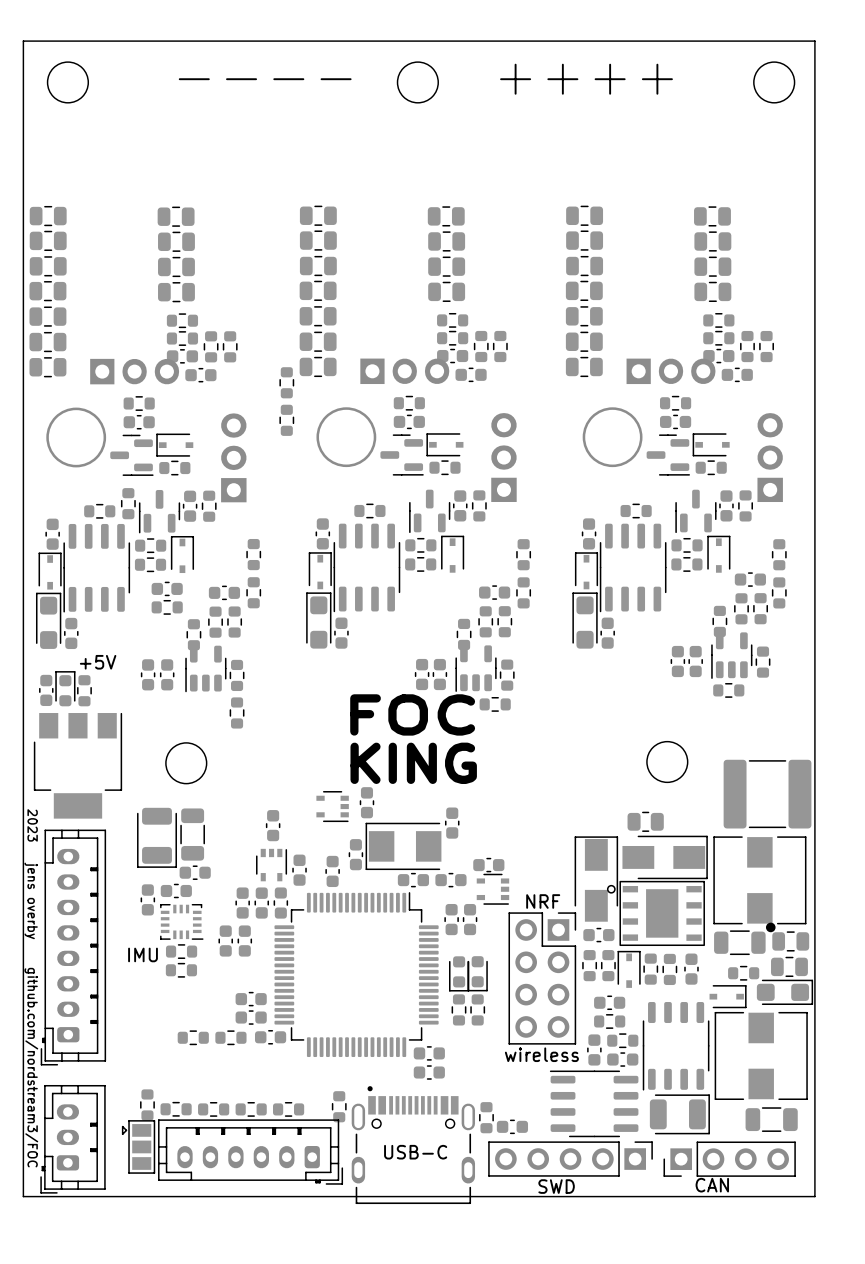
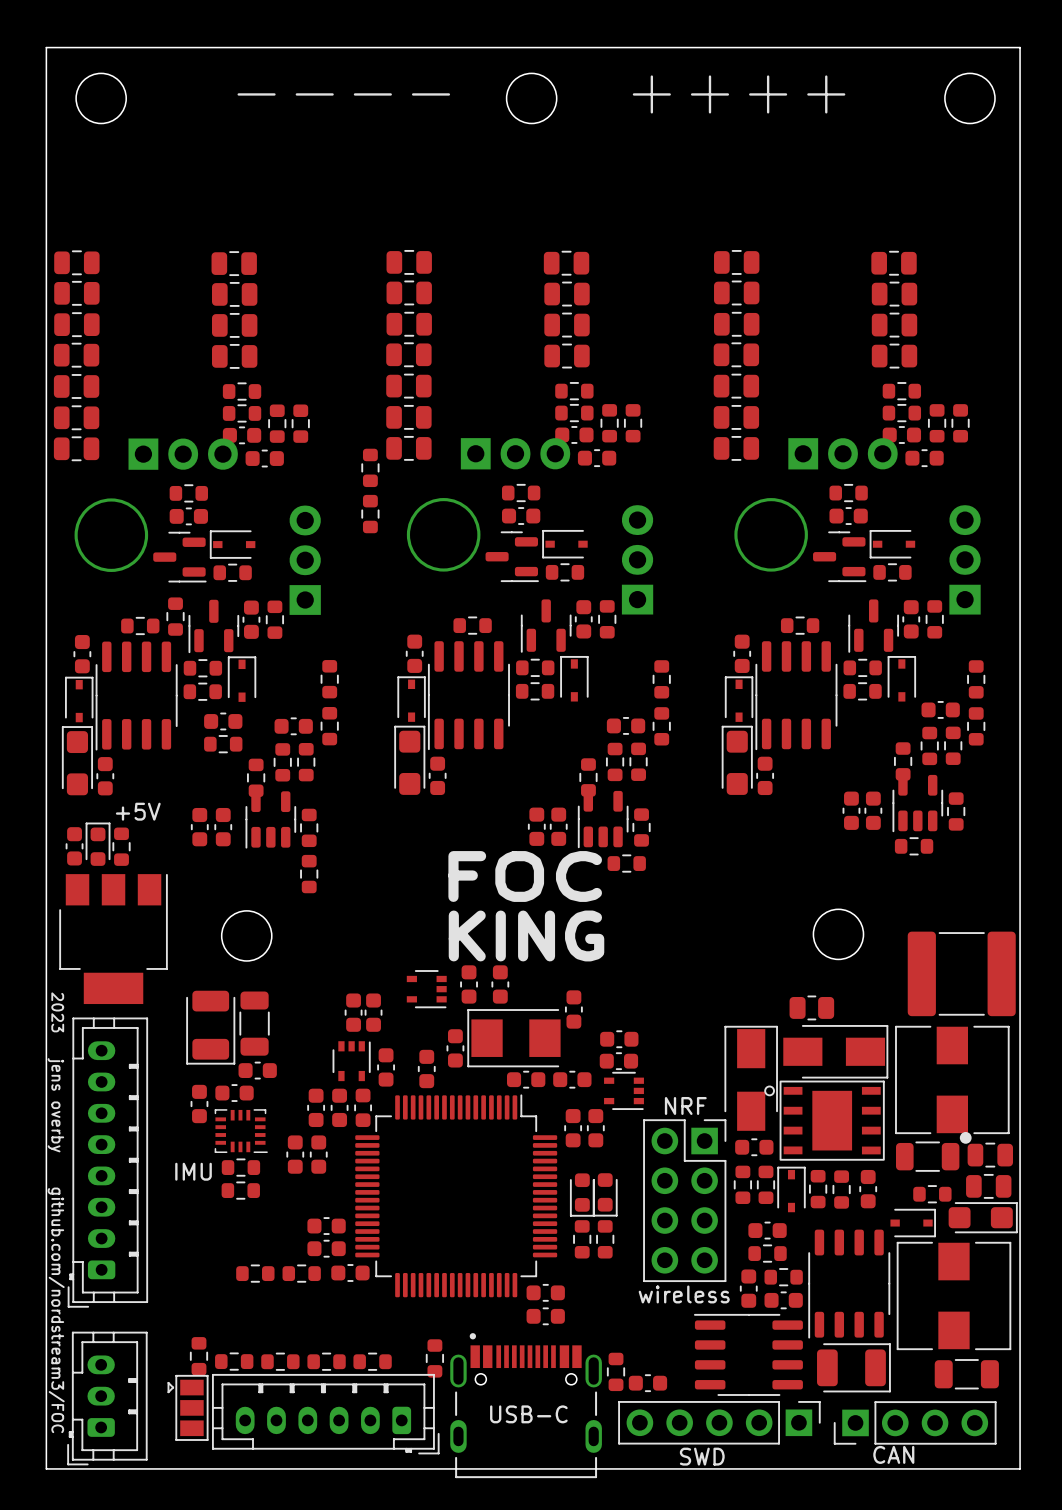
part: none -> (500, 984)
part: none -> (373, 1012)
part: none -> (619, 1039)

